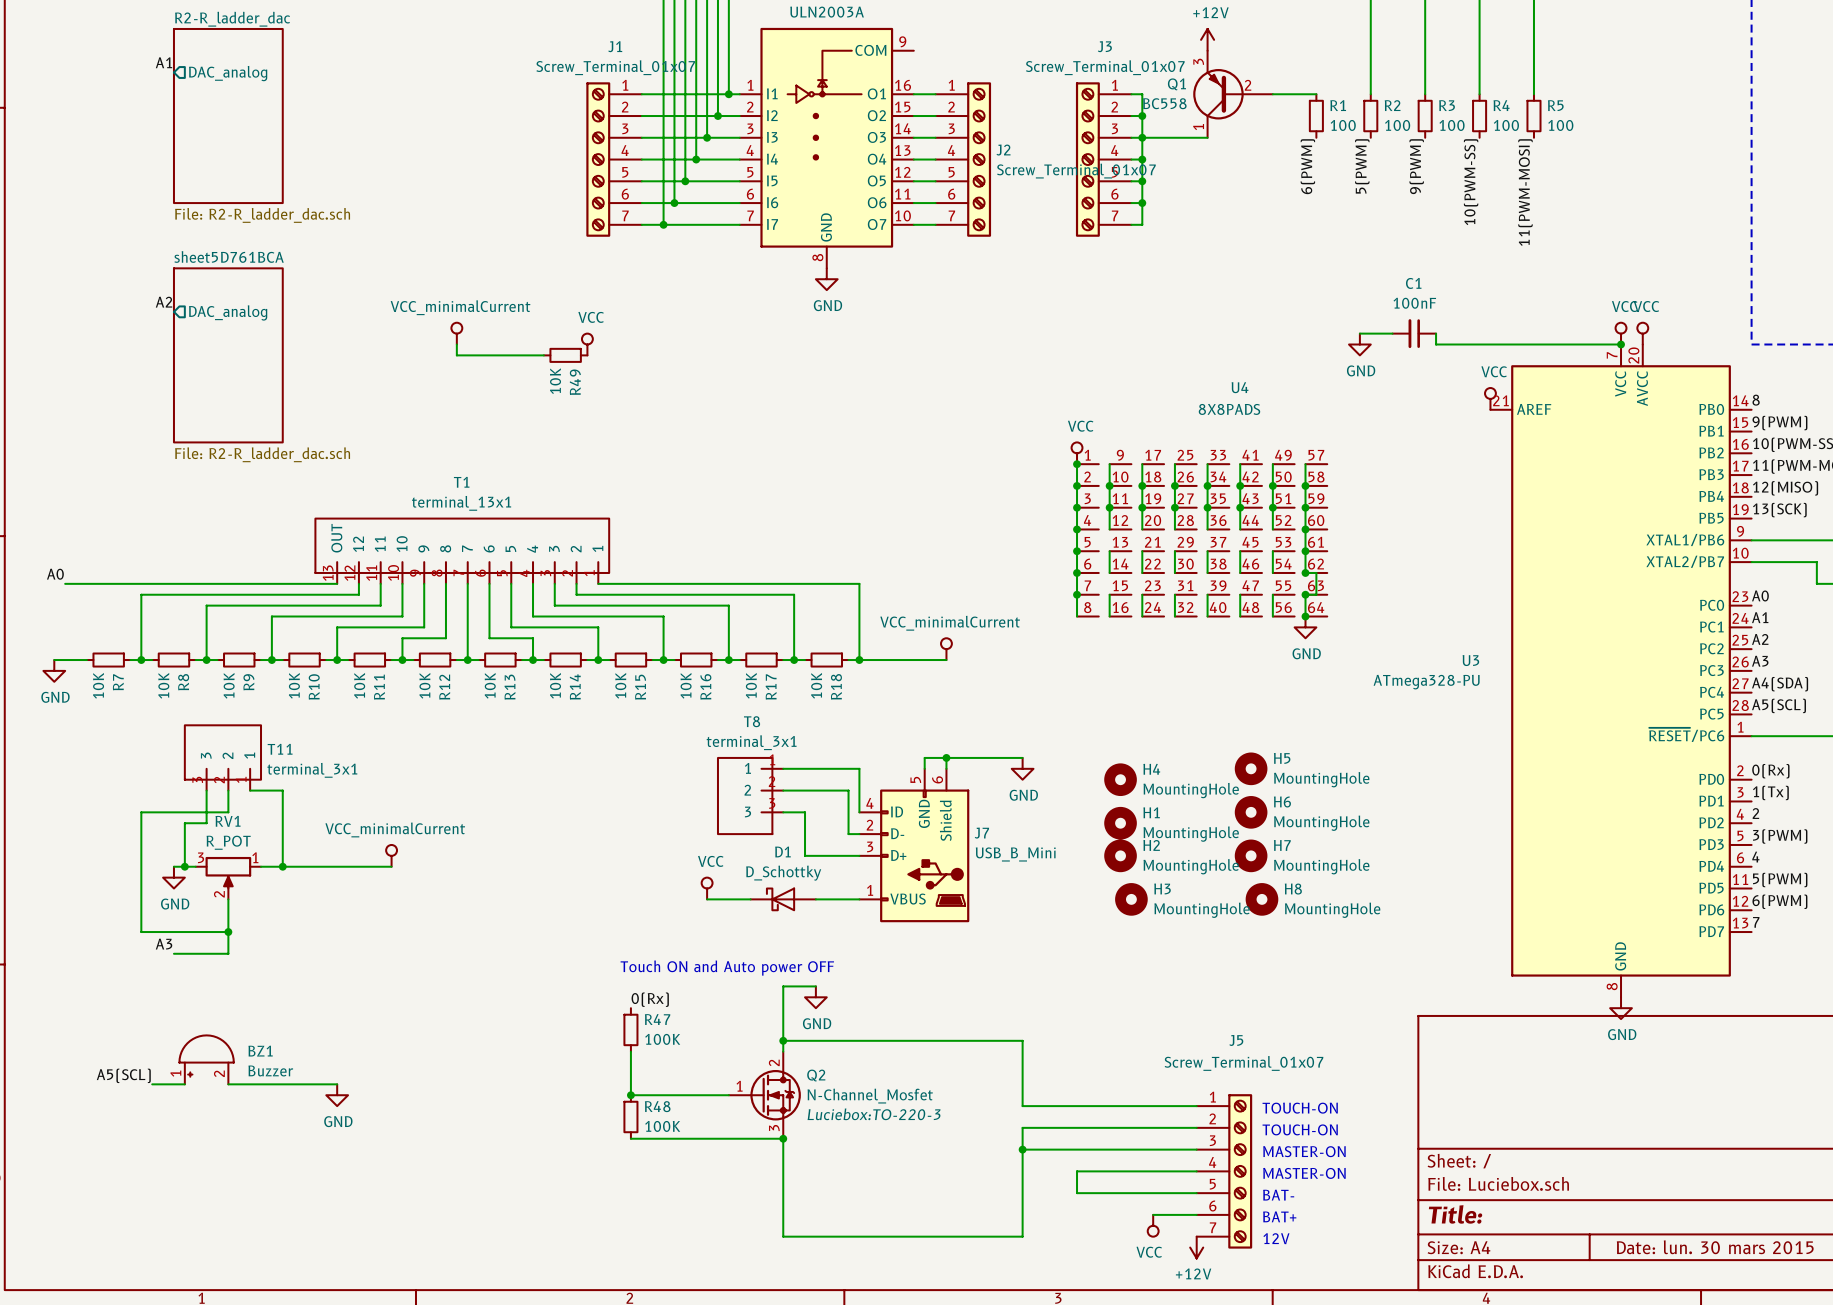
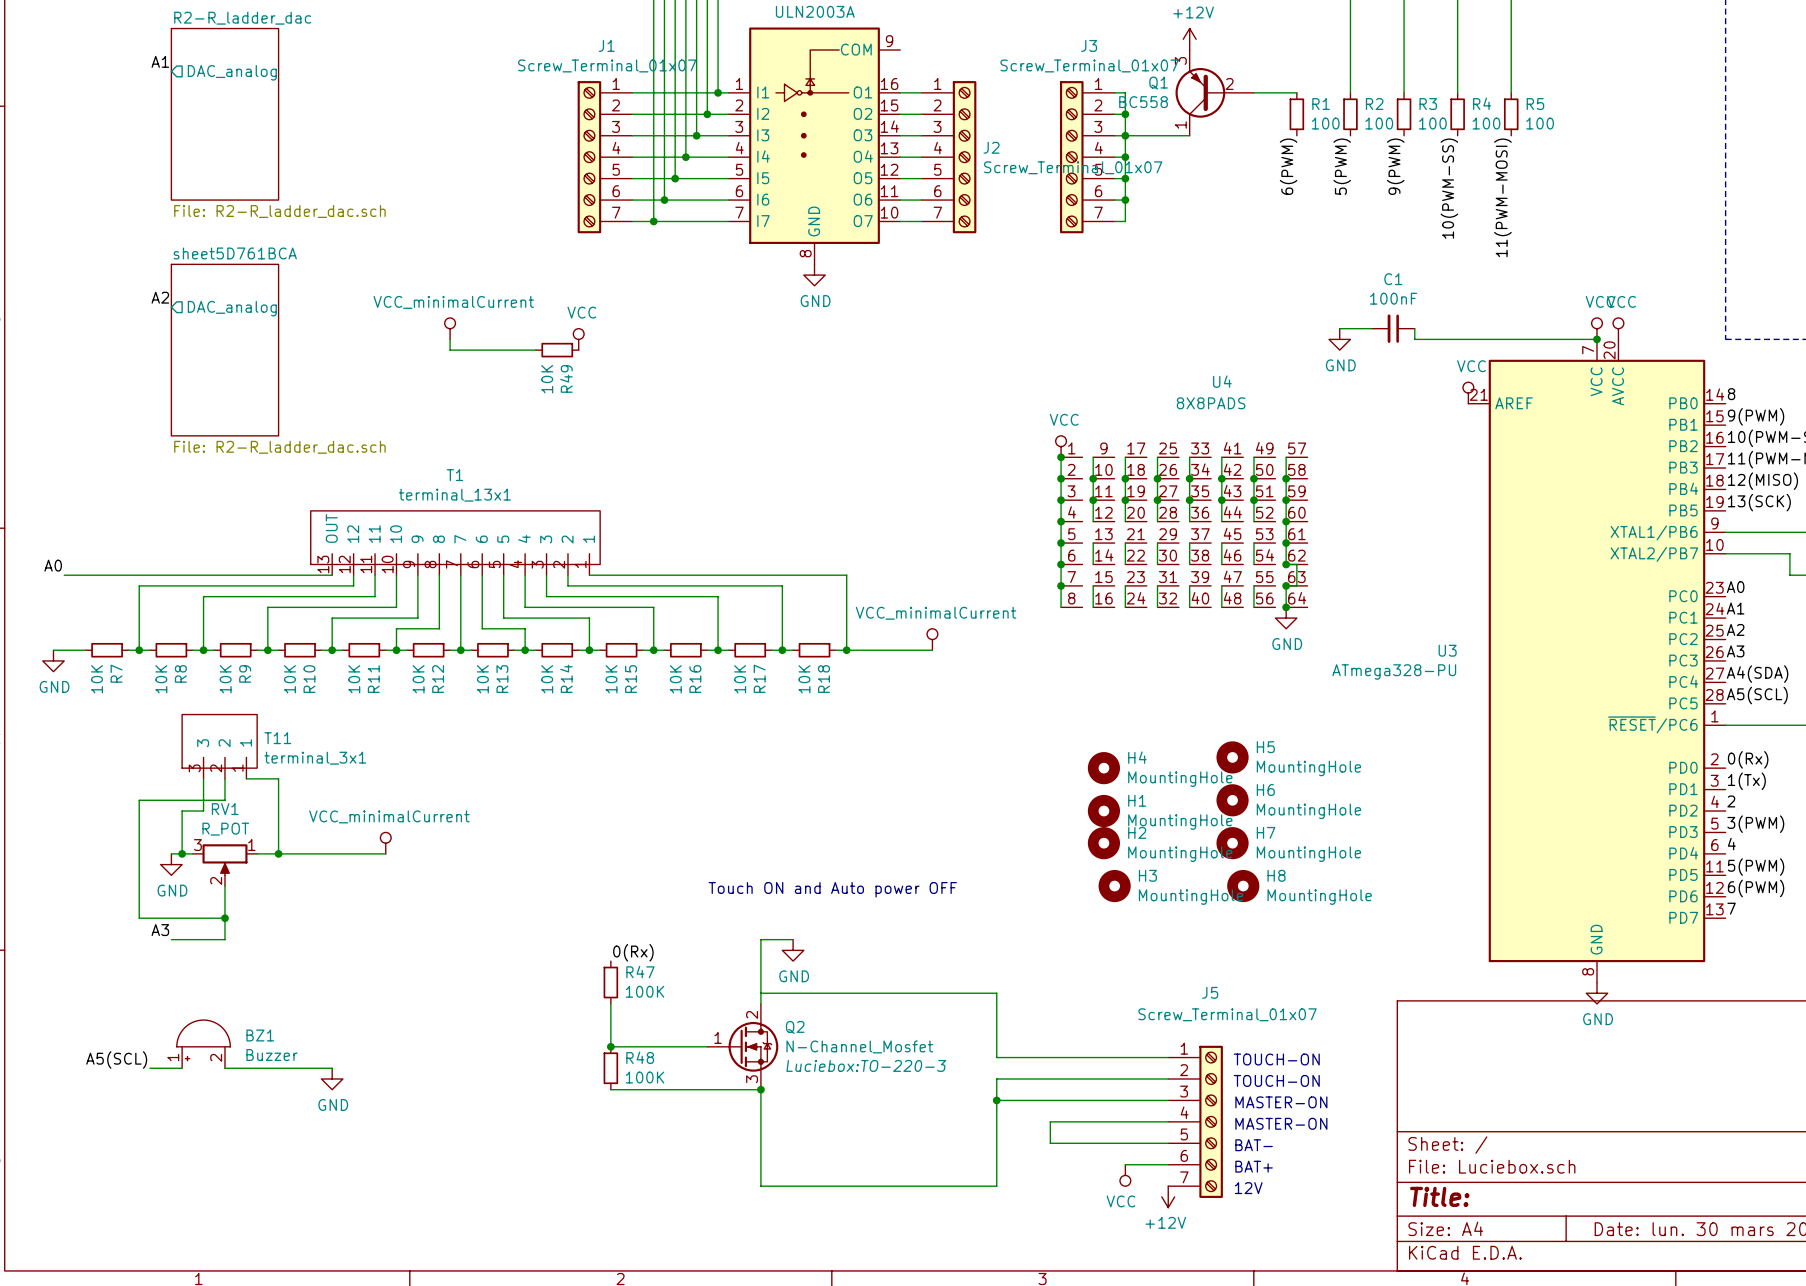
wire: (946, 757) (946, 768) -> none
junction: (946, 757) -> none
wire: (1022, 757) (924, 757) (924, 768) -> none
wire: (783, 768) (859, 768) (859, 812) -> none
power symbol: GND (1022, 768) -> none
wire: (783, 790) (848, 790) (848, 834) (859, 834) -> none
T8: terminal_3x1 (750, 796) -> none
wire: (783, 812) (805, 812) (805, 855) (859, 855) -> none
J7: USB_B_Mini (914, 845) -> none
power symbol: VCC (707, 888) -> none
wire: (707, 899) (750, 899) -> none
D1: D_Schottky (783, 899) -> none
wire: (815, 899) (859, 899) -> none
text position: Touch ON and Auto power OFF (727, 968) -> Touch ON and Auto power OFF (832, 889)
wire: (815, 986) (783, 986) (783, 1051) -> (793, 939) (760, 939) (760, 1003)
power symbol position: GND (815, 997) -> GND (793, 950)
label position: 0(Rx) (650, 999) -> 0(Rx) (633, 952)
R47 position: (630, 1029) -> (610, 982)
wire: (783, 1040) (1022, 1040) (1022, 1106) (1196, 1106) -> (760, 993) (996, 993) (996, 1057) (1168, 1057)
junction: (783, 1040) -> none
wire: (630, 1051) (630, 1095) (728, 1095) -> (610, 1003) (610, 1046) (707, 1046)
text: none -> TOUCH-ON (1276, 1059)
junction position: (630, 1095) -> (610, 1046)
Q2 position: (764, 1095) -> (742, 1046)
junction: none -> (760, 1089)
text position: TOUCH-ON (1300, 1108) -> TOUCH-ON (1276, 1080)
R48 position: (630, 1116) -> (610, 1068)
text: none -> MASTER-ON (1281, 1102)
wire: (1196, 1127) (1022, 1127) (1022, 1236) (783, 1236) (783, 1138) (630, 1138) -> (1168, 1078) (996, 1078) (996, 1186) (760, 1186) (760, 1089) (610, 1089)
text: TOUCH-ON (1300, 1129) -> none
junction: (783, 1138) -> none
wire: (1022, 1149) (1196, 1149) -> (996, 1100) (1168, 1100)
junction position: (1022, 1149) -> (996, 1100)
text position: MASTER-ON (1304, 1151) -> MASTER-ON (1281, 1123)
wire: (1196, 1171) (1077, 1171) (1077, 1193) (1196, 1193) -> (1168, 1121) (1050, 1121) (1050, 1143) (1168, 1143)
J5 position: (1224, 1171) -> (1195, 1121)
text: MASTER-ON (1304, 1173) -> none
text position: BAT- (1278, 1195) -> BAT- (1254, 1145)
wire: (1153, 1214) (1196, 1214) -> (1125, 1164) (1168, 1164)
text position: BAT+ (1279, 1216) -> BAT+ (1254, 1166)
power symbol position: VCC (1153, 1225) -> VCC (1125, 1175)
text position: 12V (1276, 1238) -> 12V (1248, 1188)
power symbol position: +12V (1196, 1247) -> +12V (1168, 1196)

